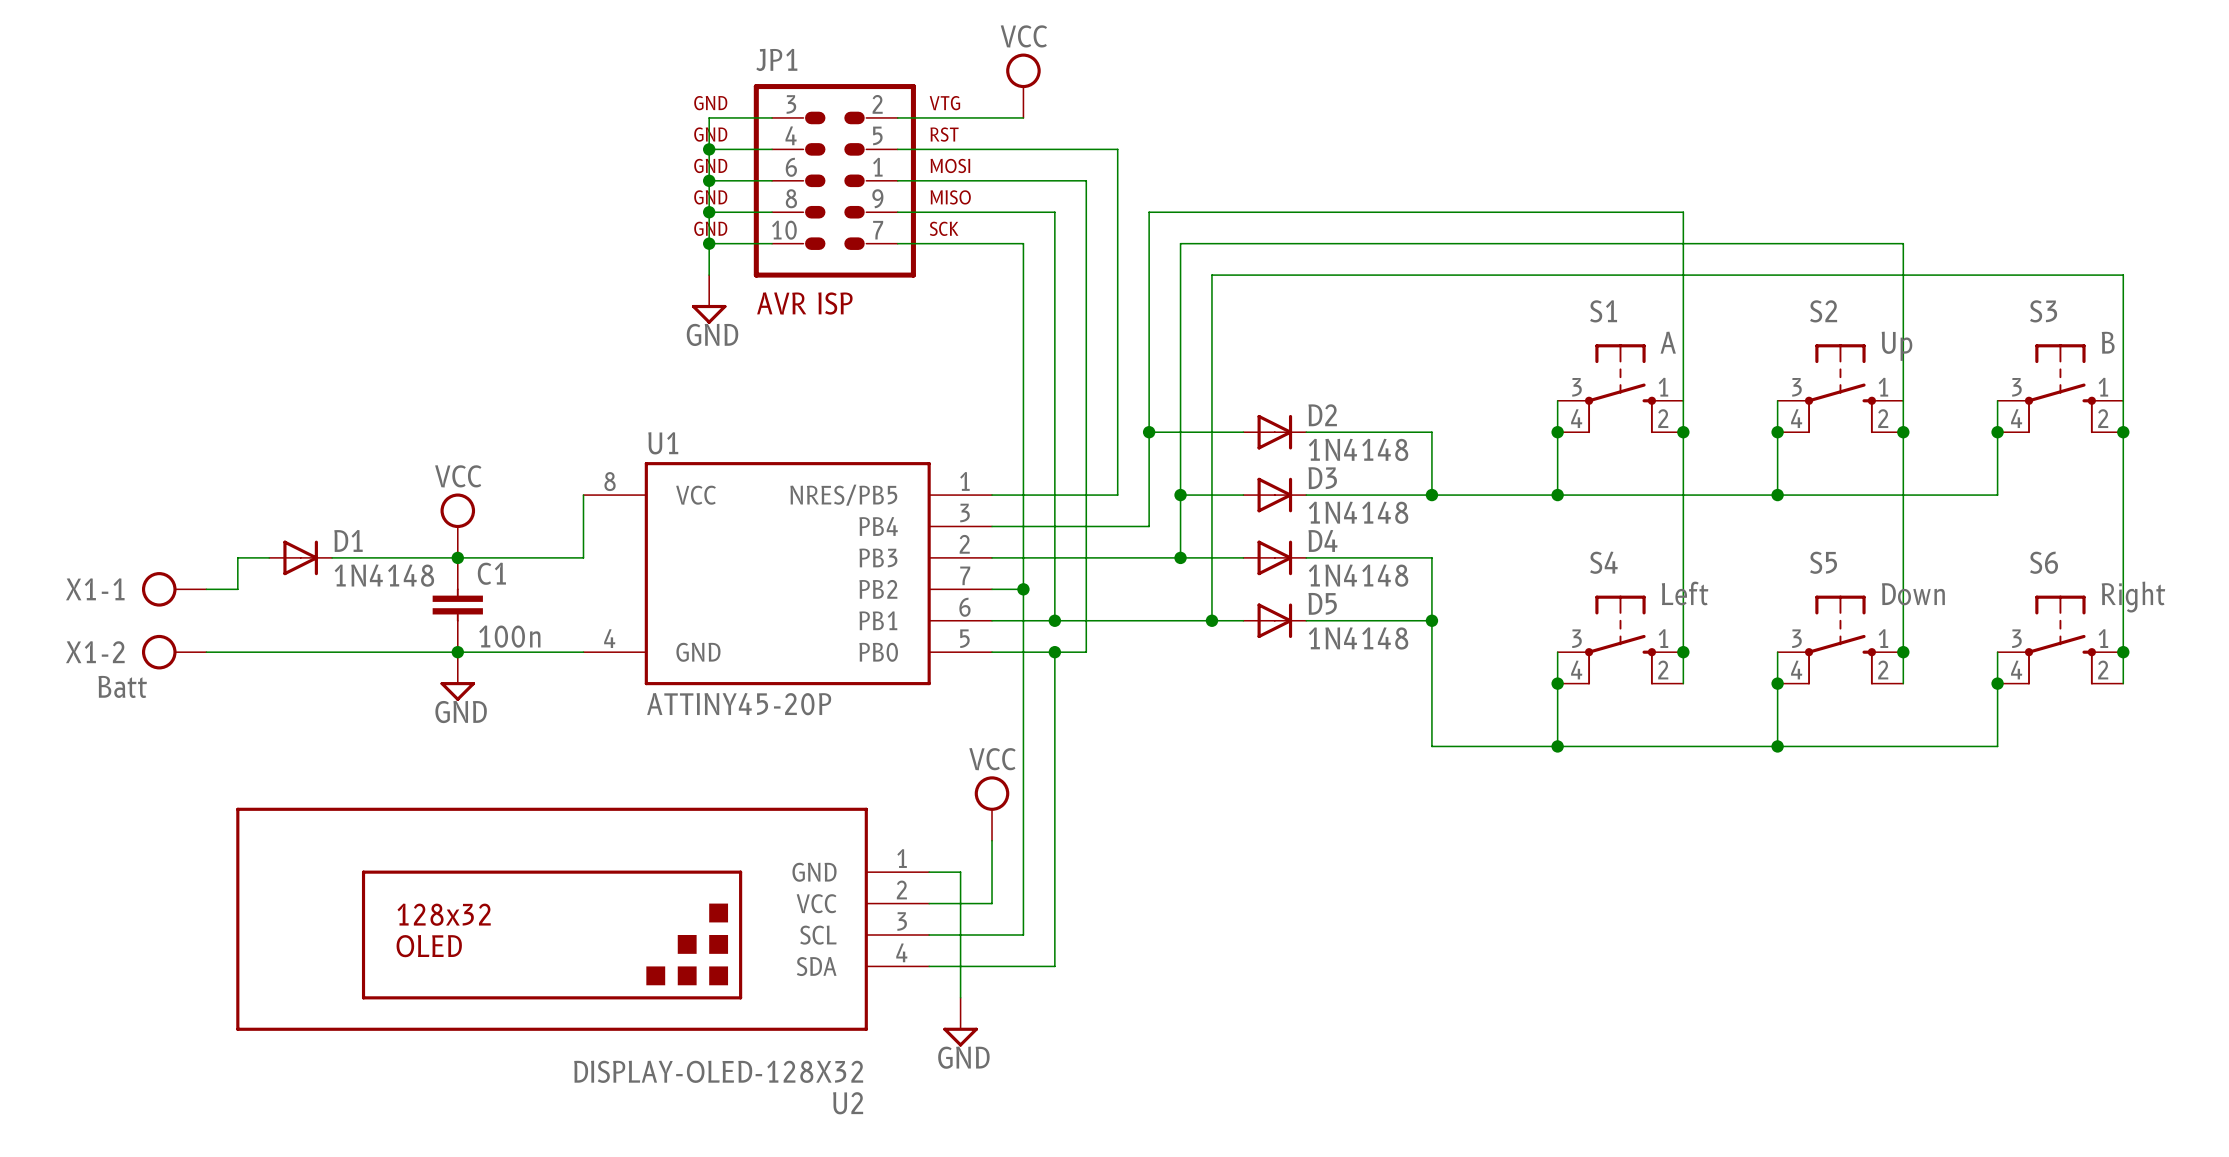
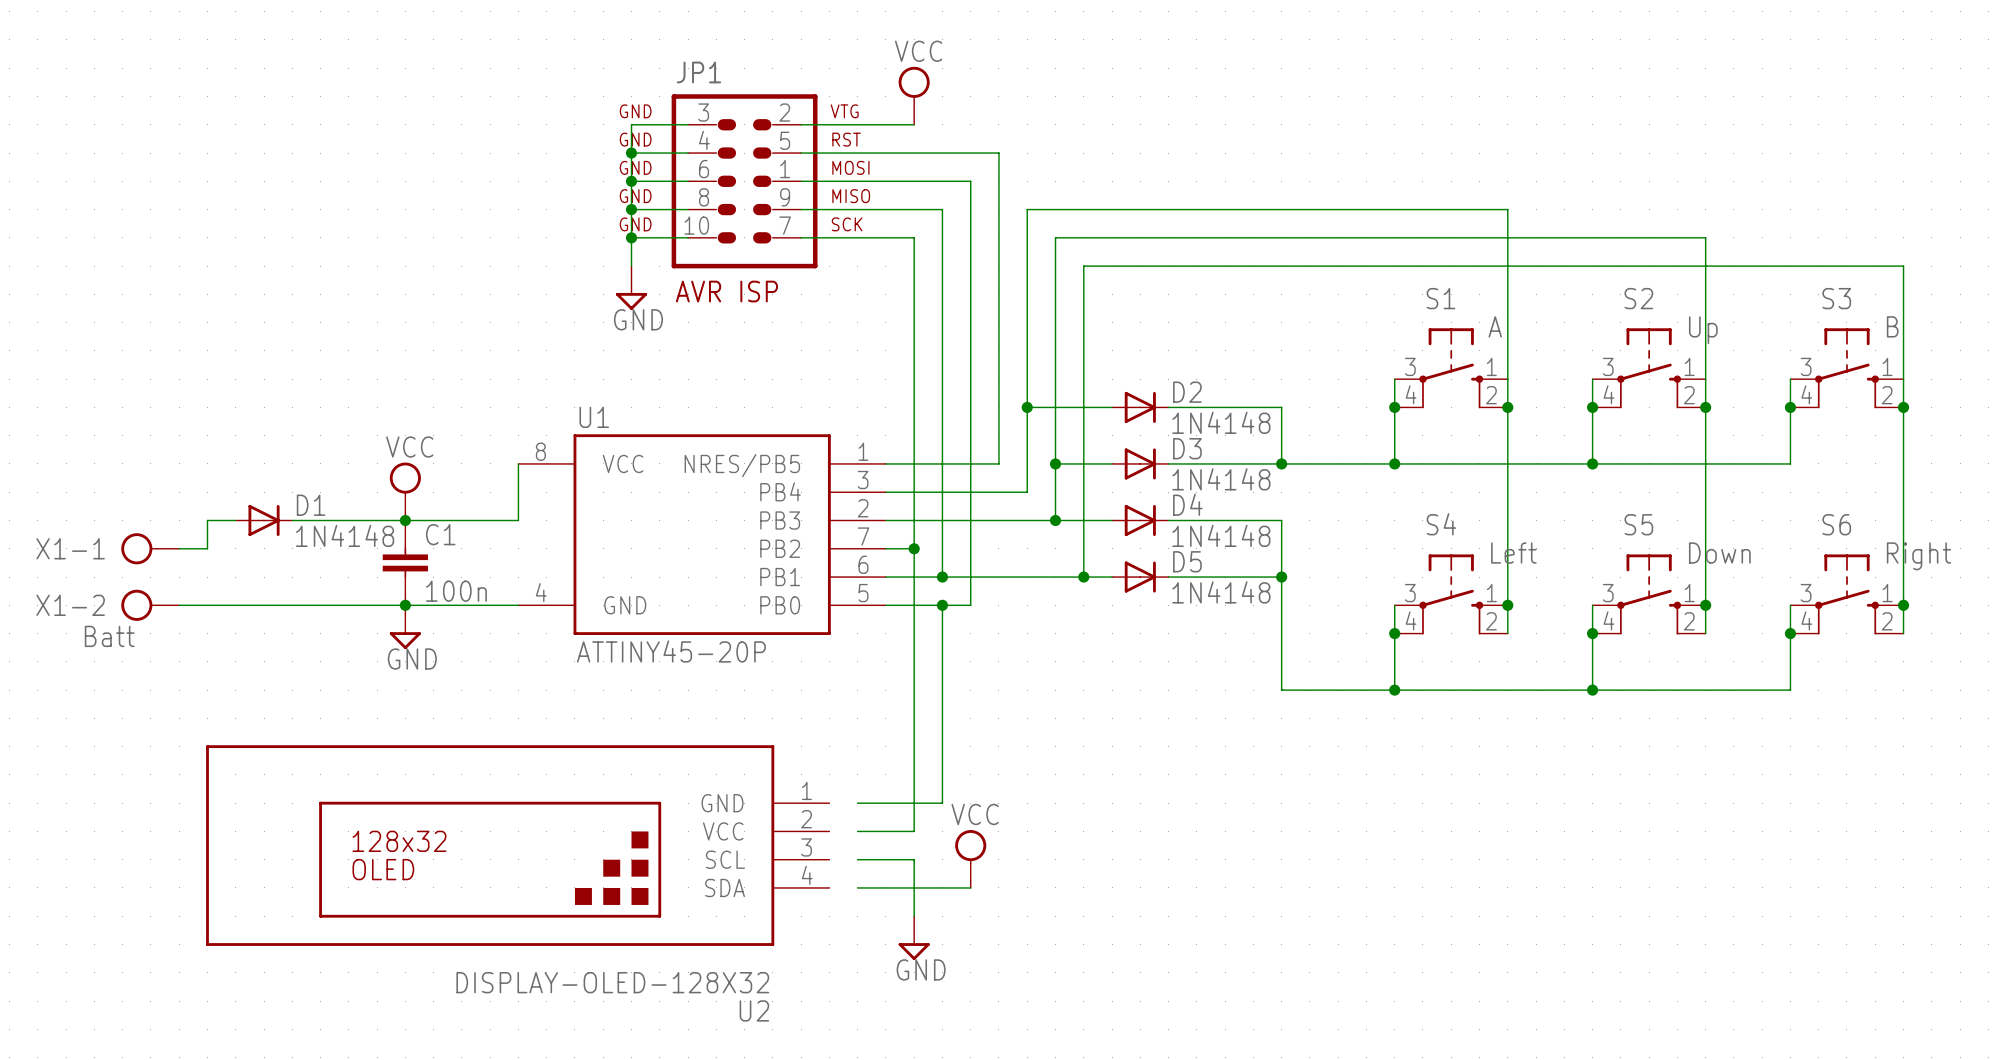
power symbol position: VCC (992, 808) -> VCC (970, 859)
wire: (992, 840) (992, 903) -> (914, 859) (914, 916)
wire: (929, 872) (960, 872) (960, 997) -> none
wire: none -> (857, 803) (942, 803)
wire: (1054, 872) (1054, 966) -> (970, 887) (942, 887)
wire: (929, 903) (960, 903) -> none
wire: (1023, 903) (1023, 935) -> (914, 831) (885, 831)
wire: (929, 935) (960, 935) -> none
wire: (929, 966) (960, 966) -> none
power symbol position: GND (960, 1022) -> GND (914, 938)

